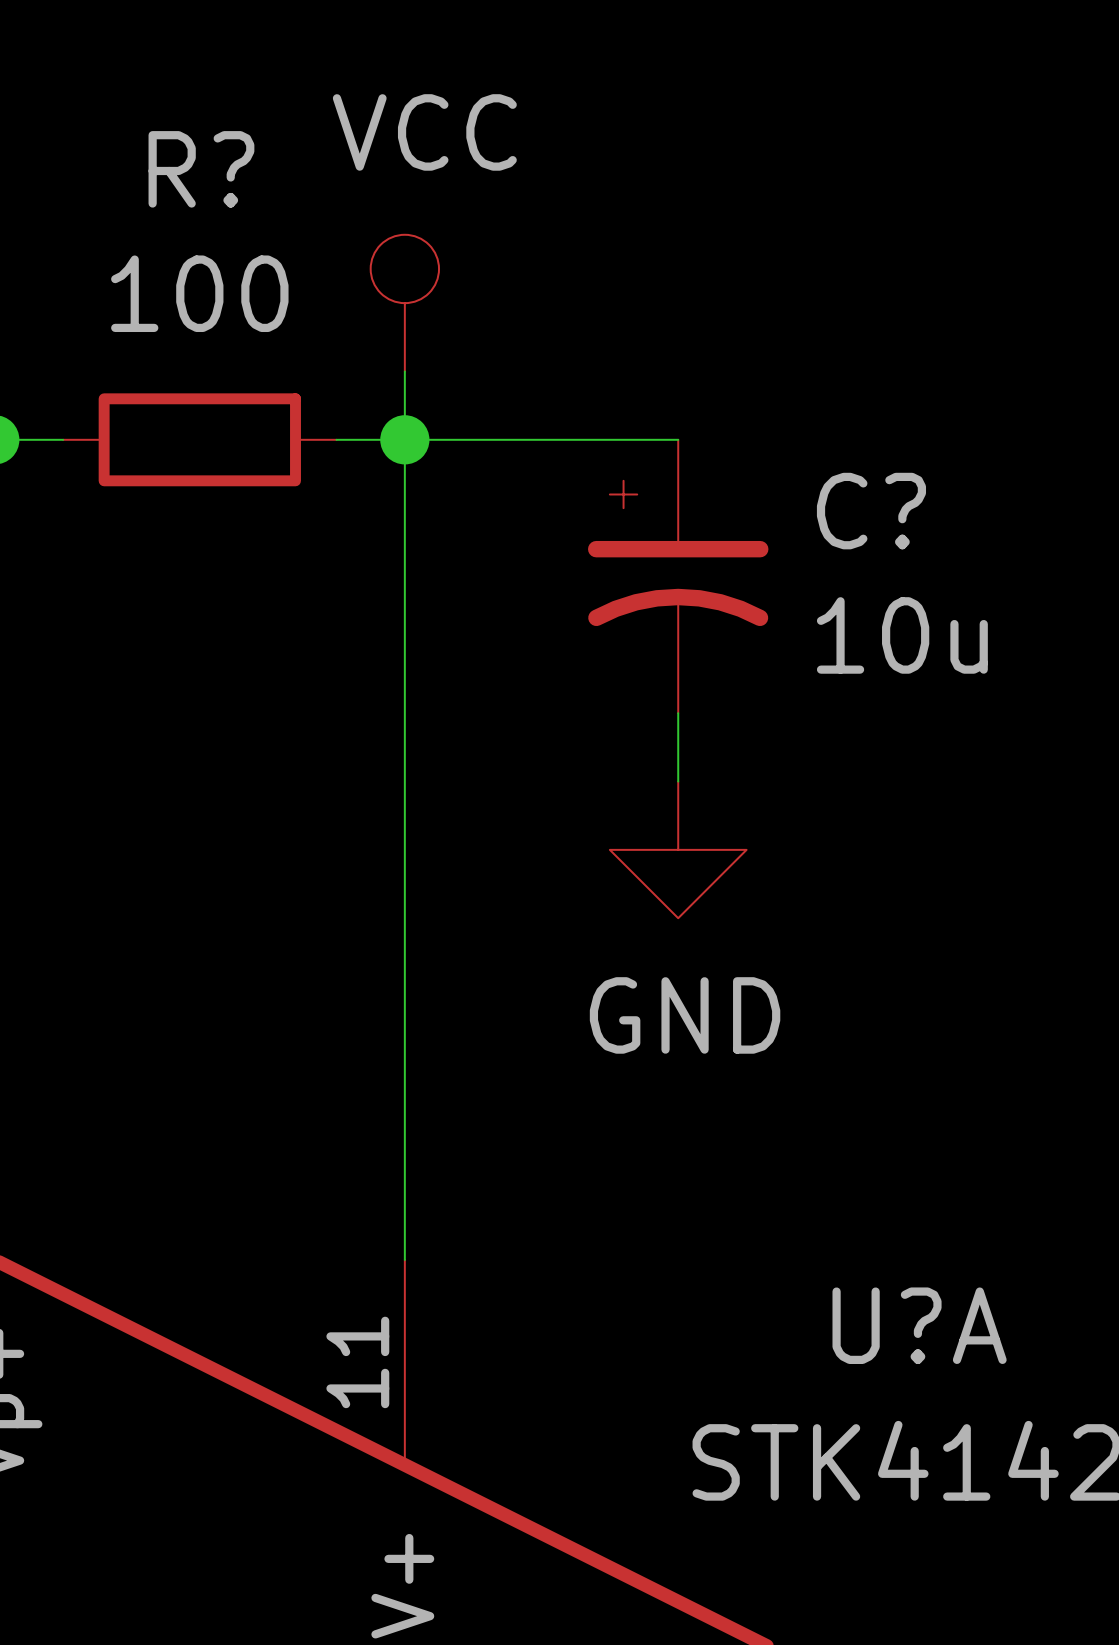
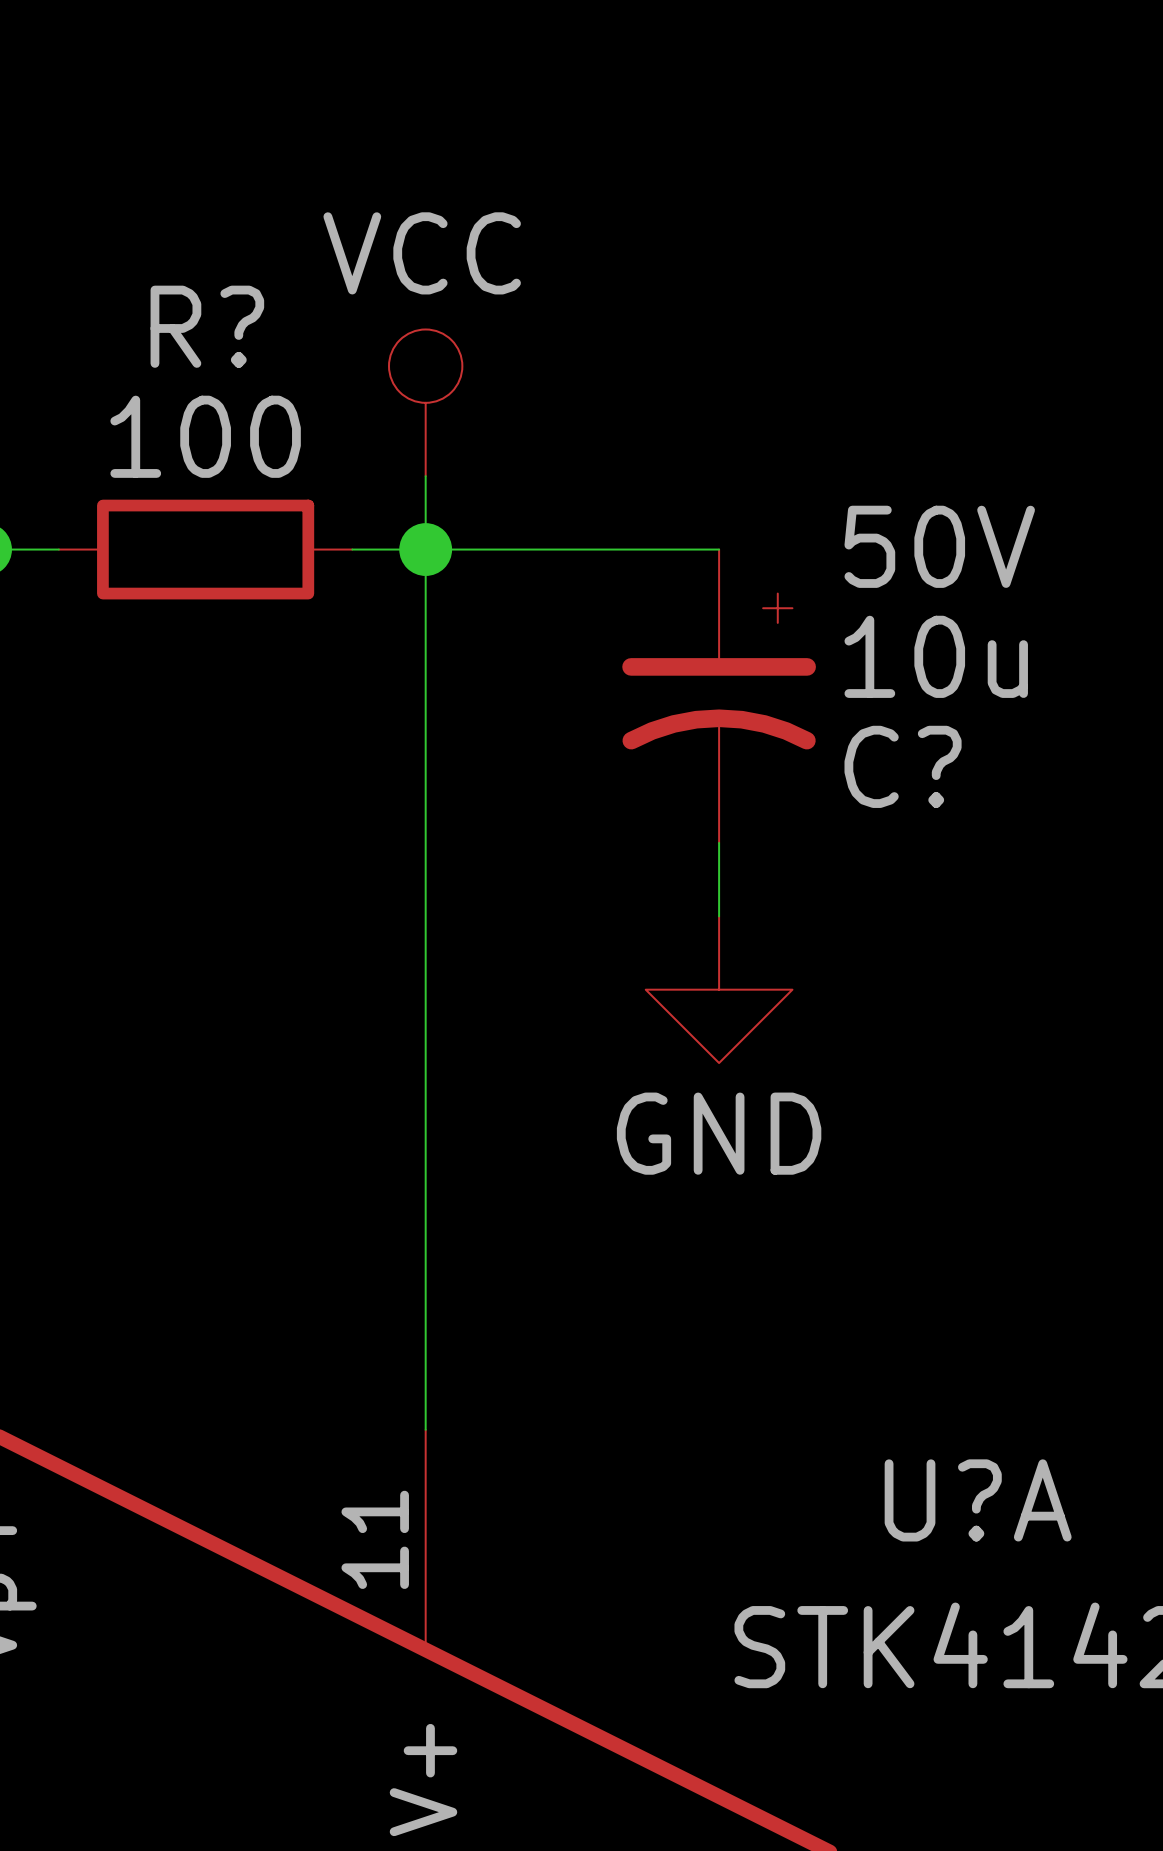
power symbol text position: VCC (424, 132) -> VCC (422, 253)
R? name position: R? (201, 169) -> R? (207, 326)
R? value position: 100 (199, 293) -> 100 (205, 436)
C? text: none -> 50V (939, 546)
C? name position: C? (871, 511) -> C? (903, 766)
C? flip: as is (678, 553) -> left-right (719, 671)
power symbol text position: GND (685, 1015) -> GND (719, 1133)

